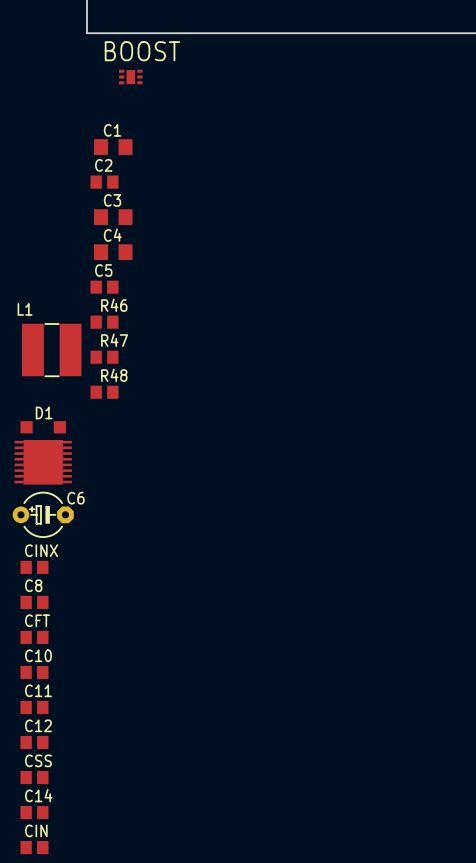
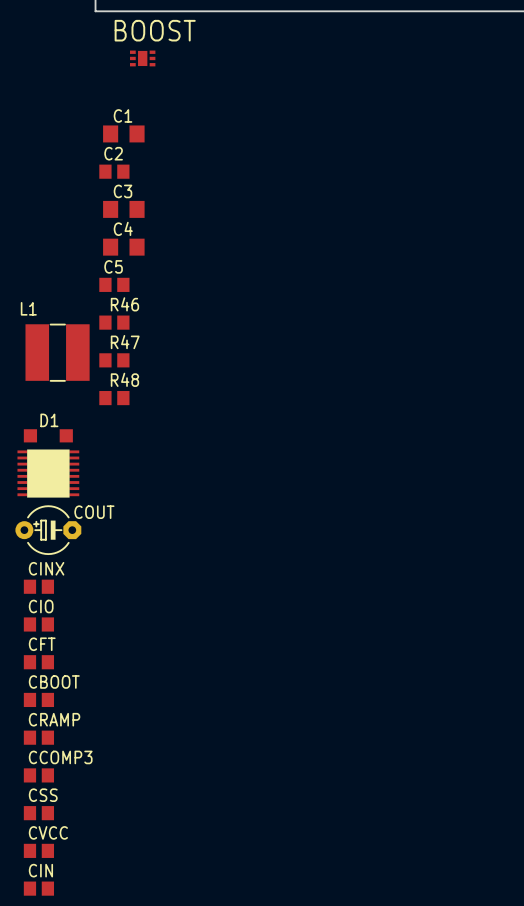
part footprint: [14, 439, 72, 485] -> [17, 449, 80, 498]
C6 name: C6 (75, 498) -> COUT (94, 512)
C8 name: C8 (33, 585) -> CIO (41, 606)
C10 name: C10 (38, 655) -> CBOOT (54, 681)
C11 name: C11 (38, 690) -> CRAMP (54, 719)
C12 name: C12 (38, 725) -> CCOMP3 (60, 757)
C14 name: C14 (38, 795) -> CVCC (48, 832)

